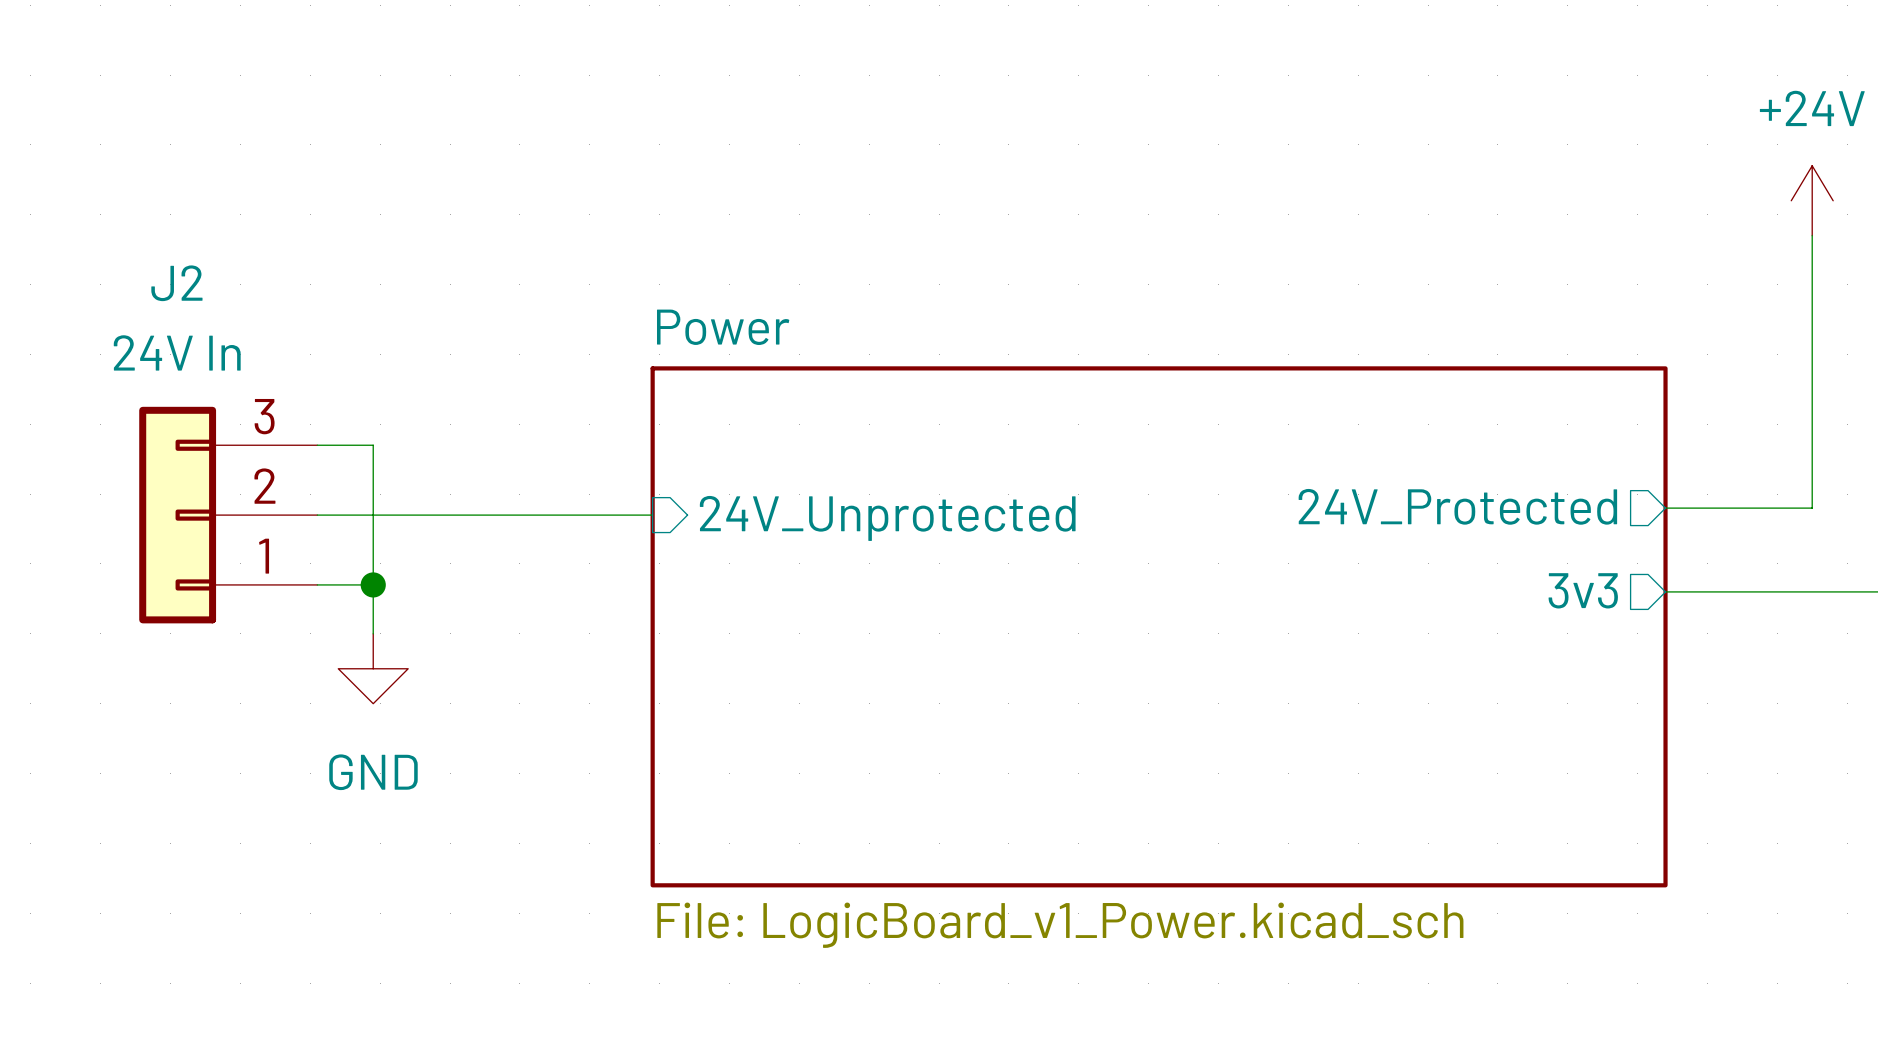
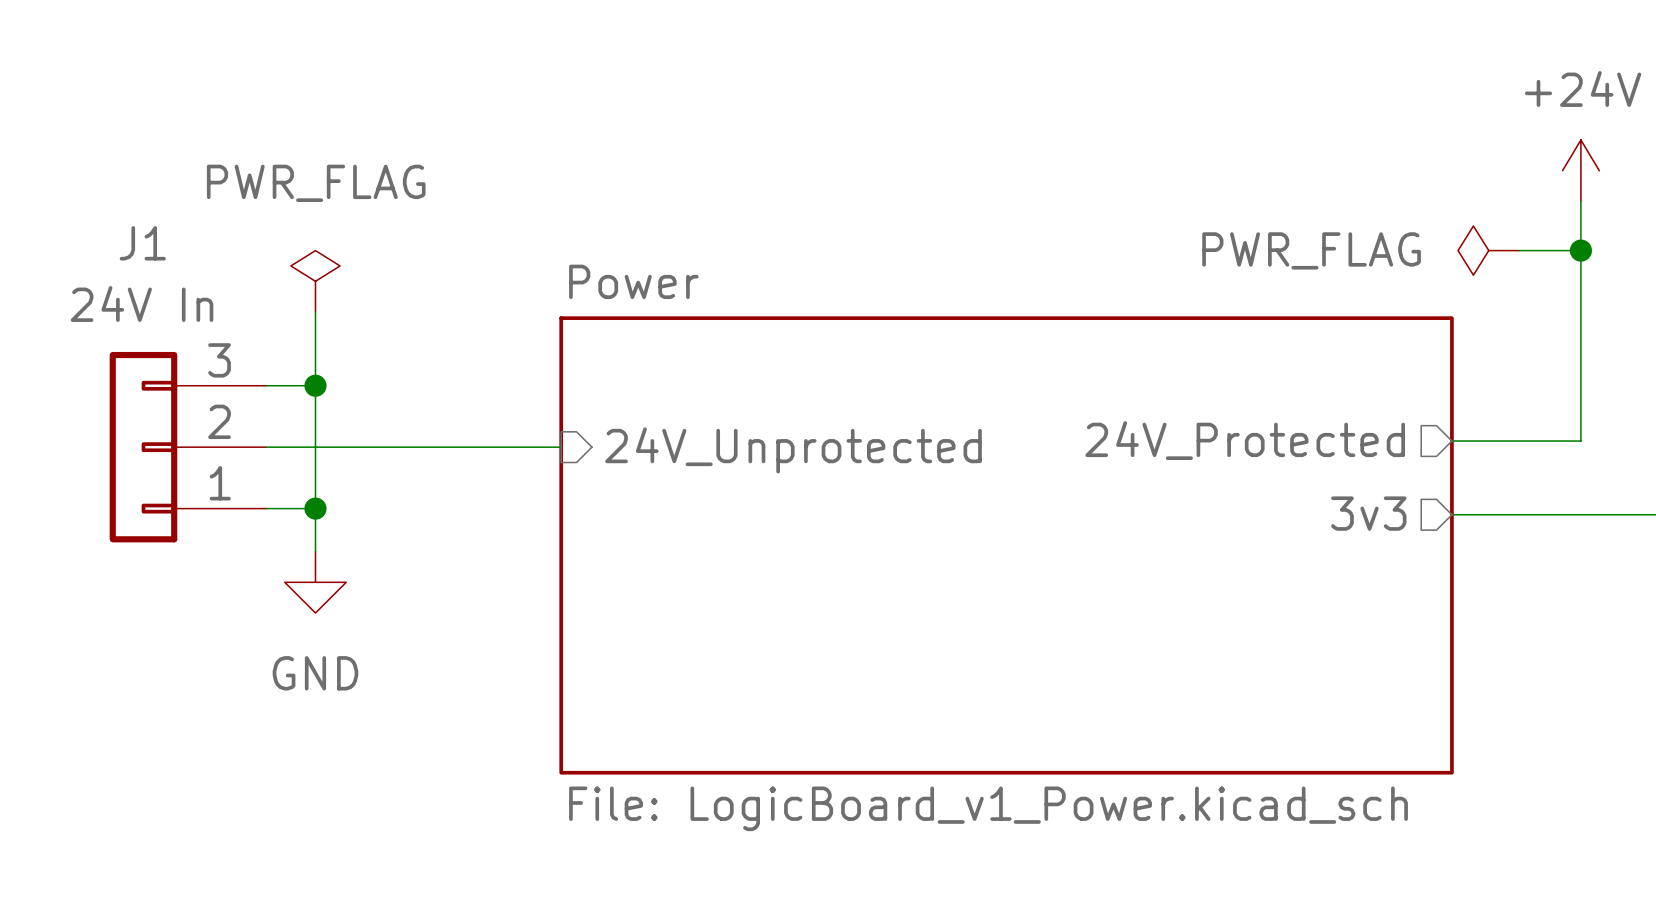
J2 name: J2 (176, 283) -> J1 (142, 243)
power symbol: none -> PWR_FLAG (1488, 250)
wire: none -> (1519, 250) (1580, 250)
junction: none -> (1580, 250)
power symbol: none -> PWR_FLAG (315, 281)
wire: none -> (315, 312) (315, 385)
junction: none -> (315, 385)

